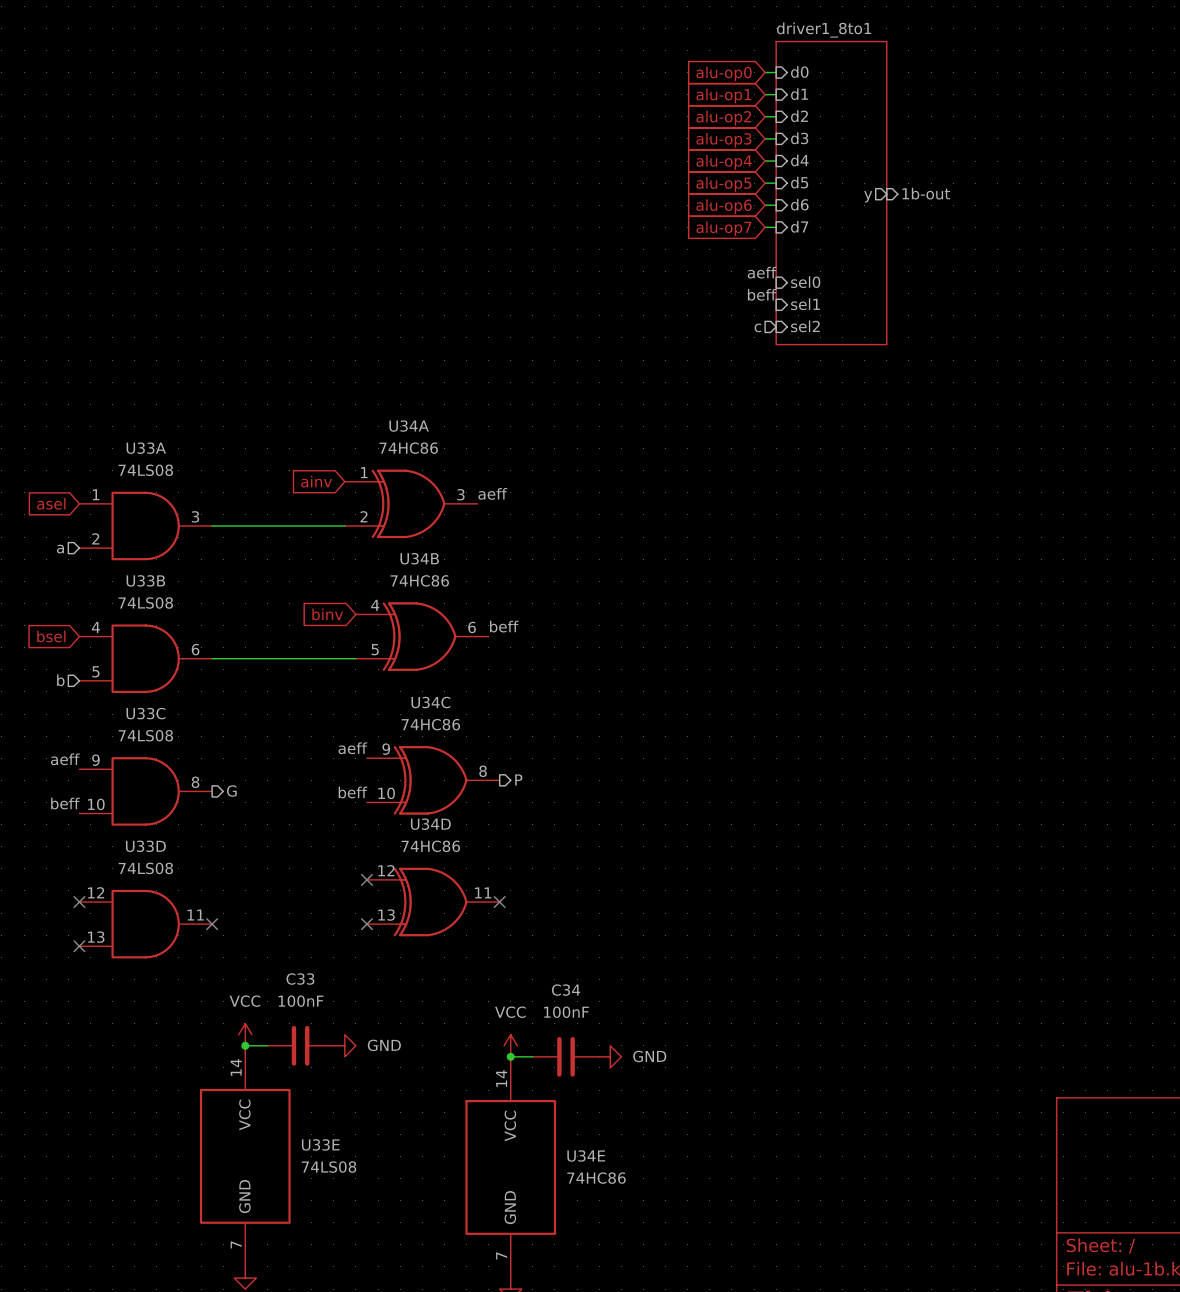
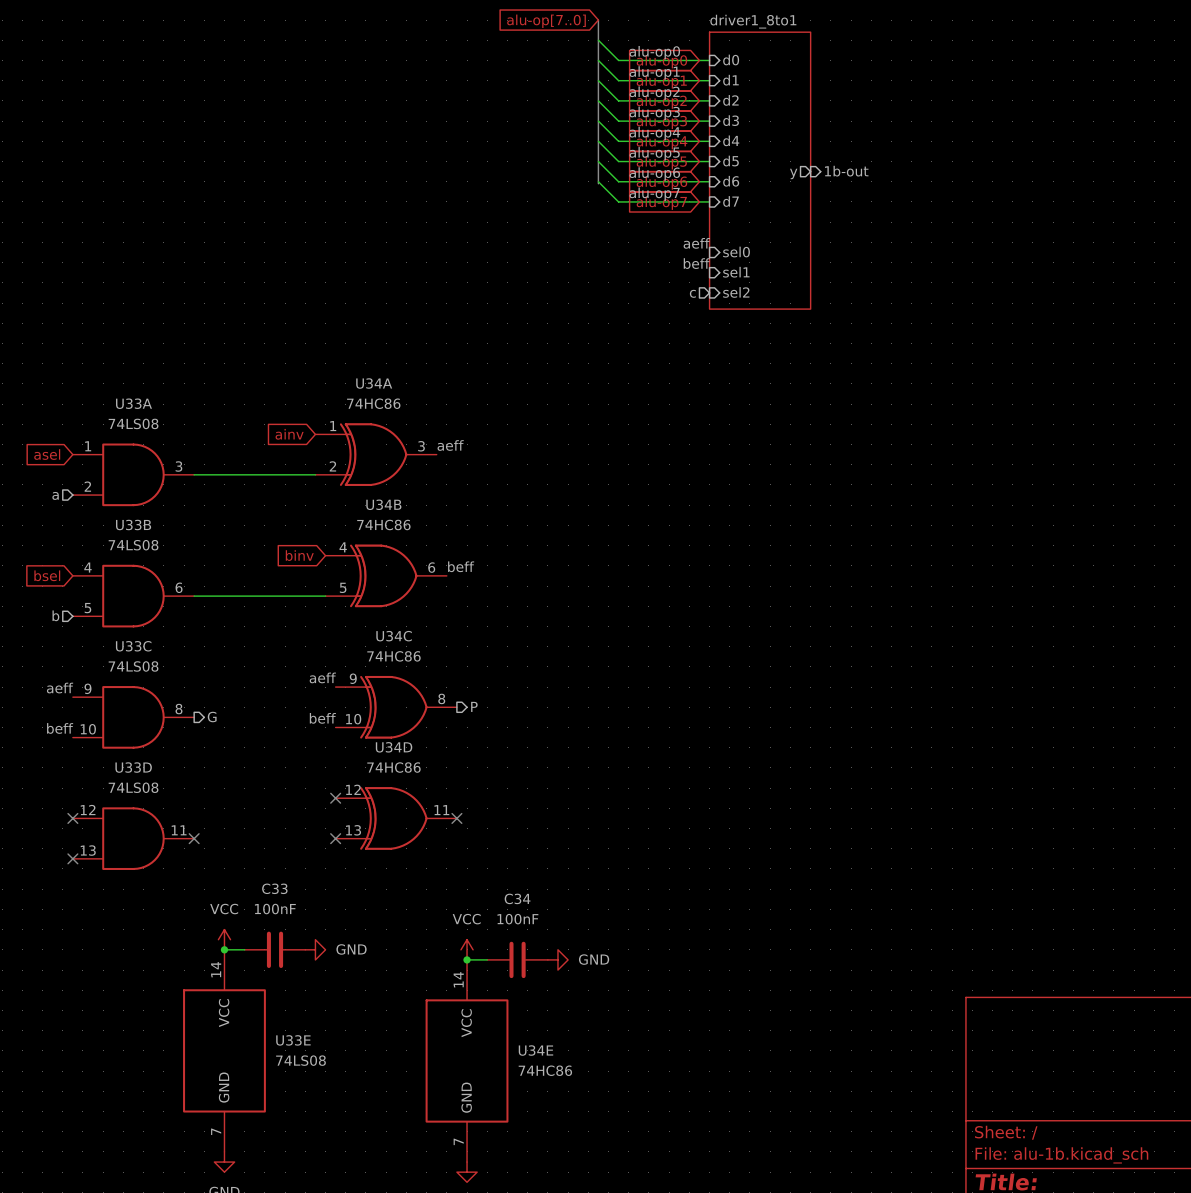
bus: none -> (598, 20) (598, 183)
global label: none -> alu-op[7..0] (546, 21)
wire: none -> (598, 40) (618, 60) (699, 60)
label: none -> alu-op0 (654, 52)
wire: none -> (598, 60) (618, 80) (699, 80)
label: none -> alu-op1 (654, 72)
wire: none -> (598, 80) (618, 100) (699, 100)
label: none -> alu-op2 (654, 93)
wire: none -> (598, 100) (618, 121) (699, 121)
label: none -> alu-op3 (654, 113)
wire: none -> (598, 121) (618, 141) (699, 141)
label: none -> alu-op4 (654, 133)
wire: none -> (598, 141) (618, 161) (699, 161)
label: none -> alu-op5 (654, 153)
wire: none -> (598, 161) (618, 181) (699, 181)
label: none -> alu-op6 (654, 173)
wire: none -> (598, 181) (618, 201) (699, 201)
label: none -> alu-op7 (654, 194)

